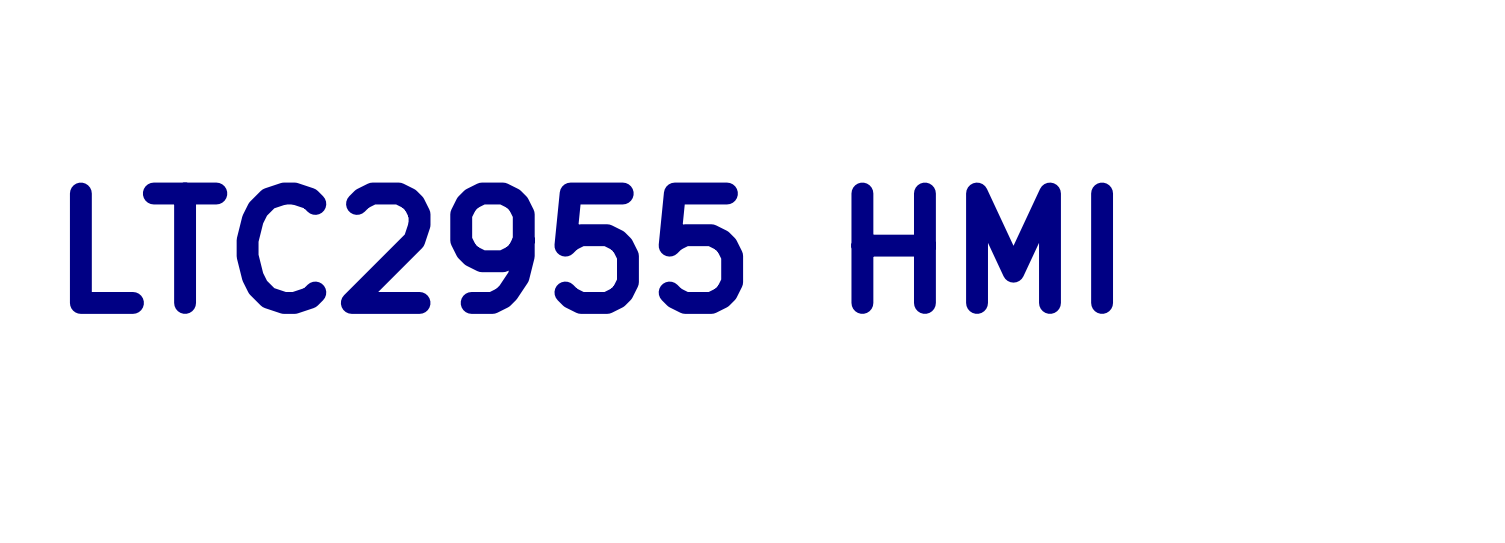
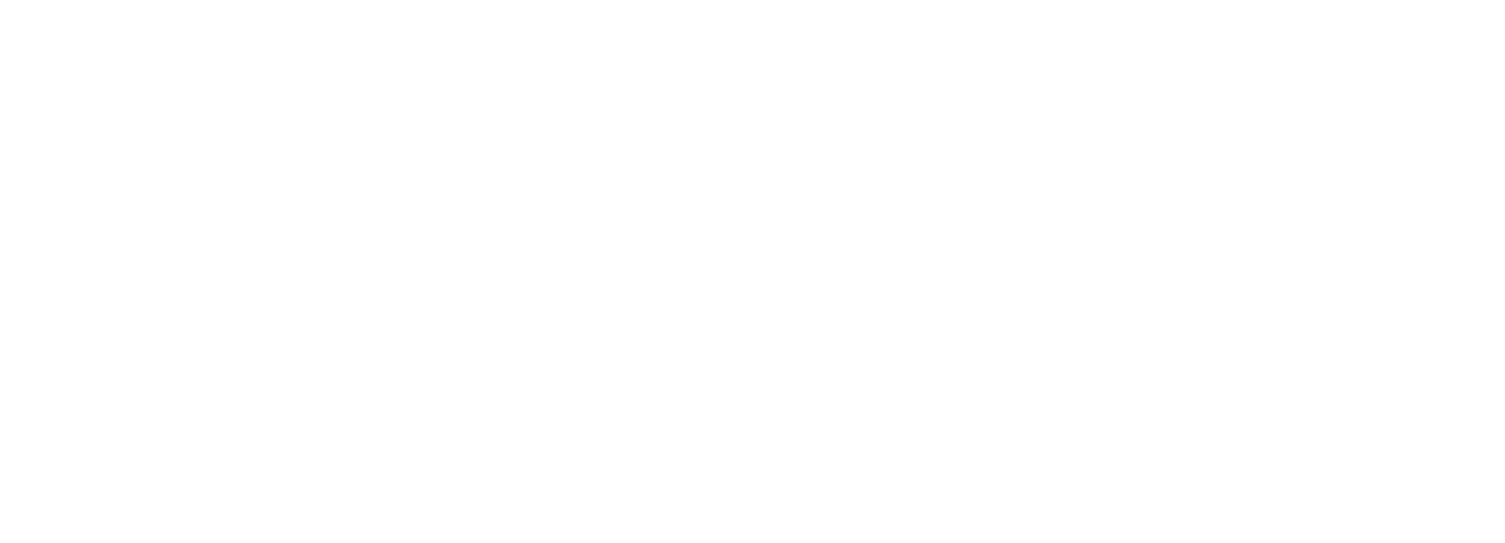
text: LTC2955 HMI (591, 248) -> none

